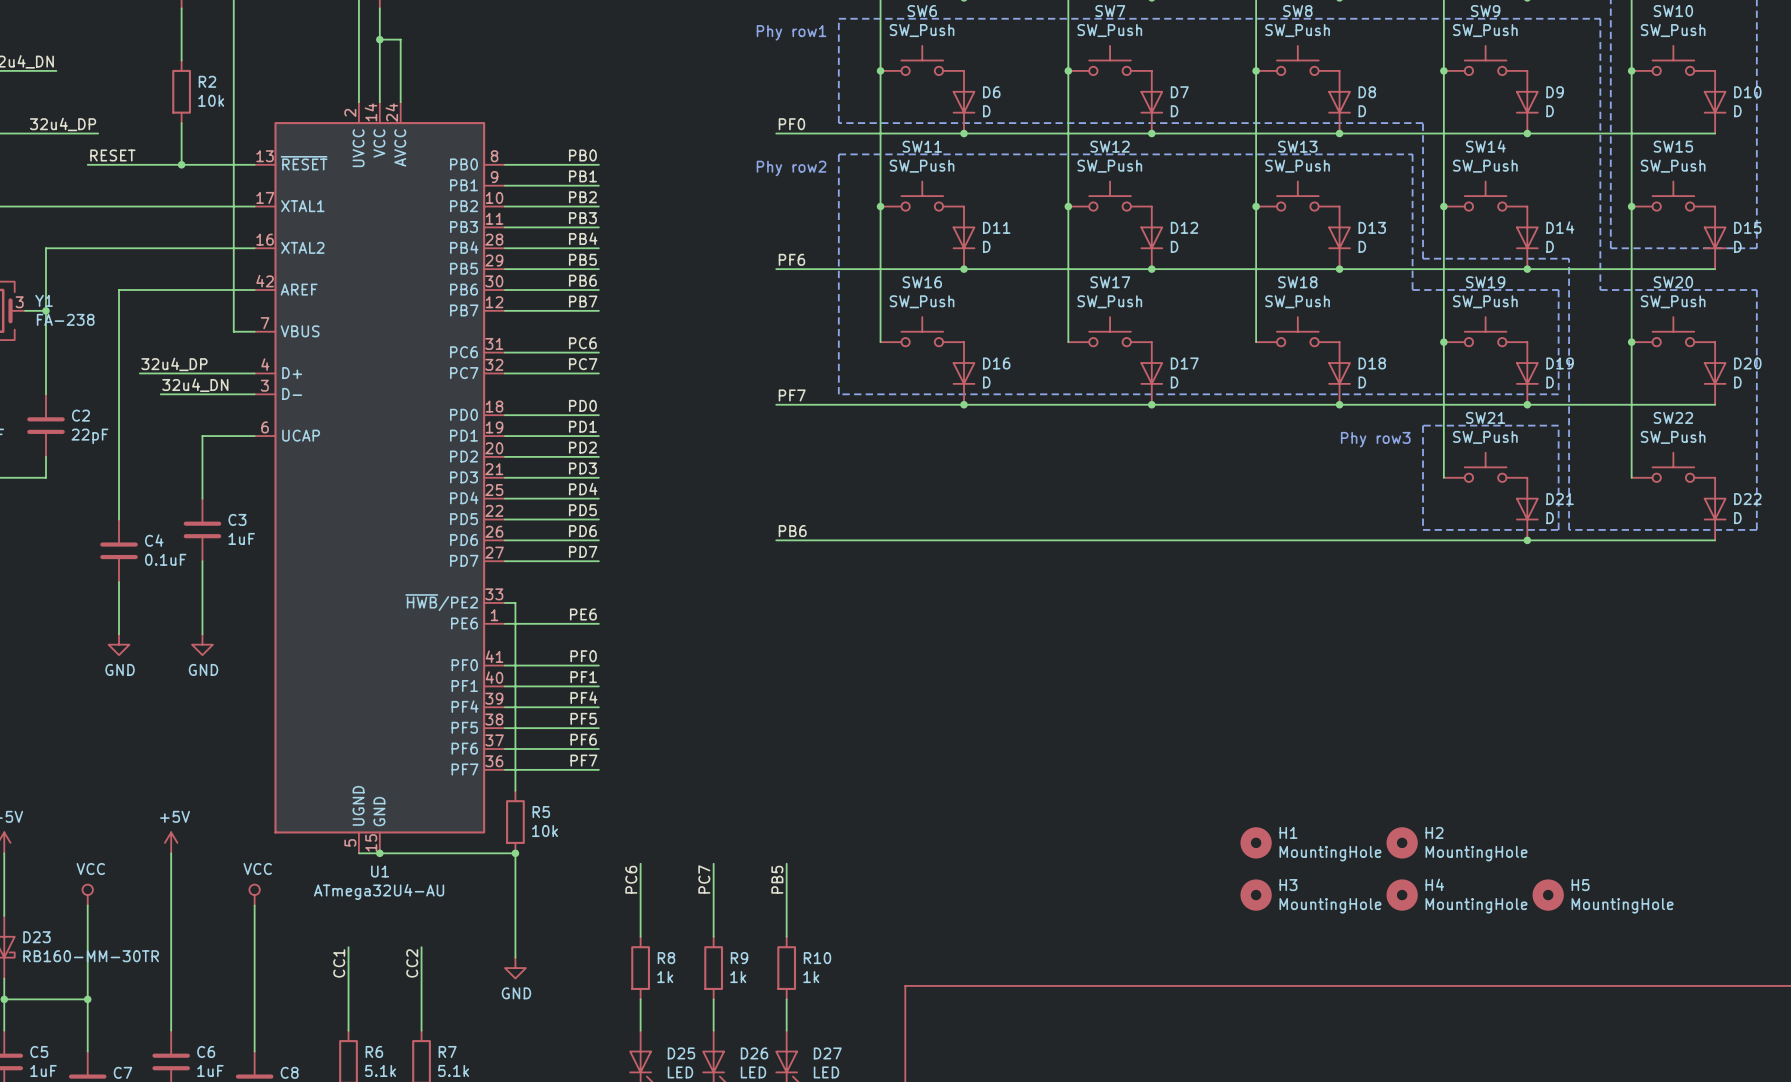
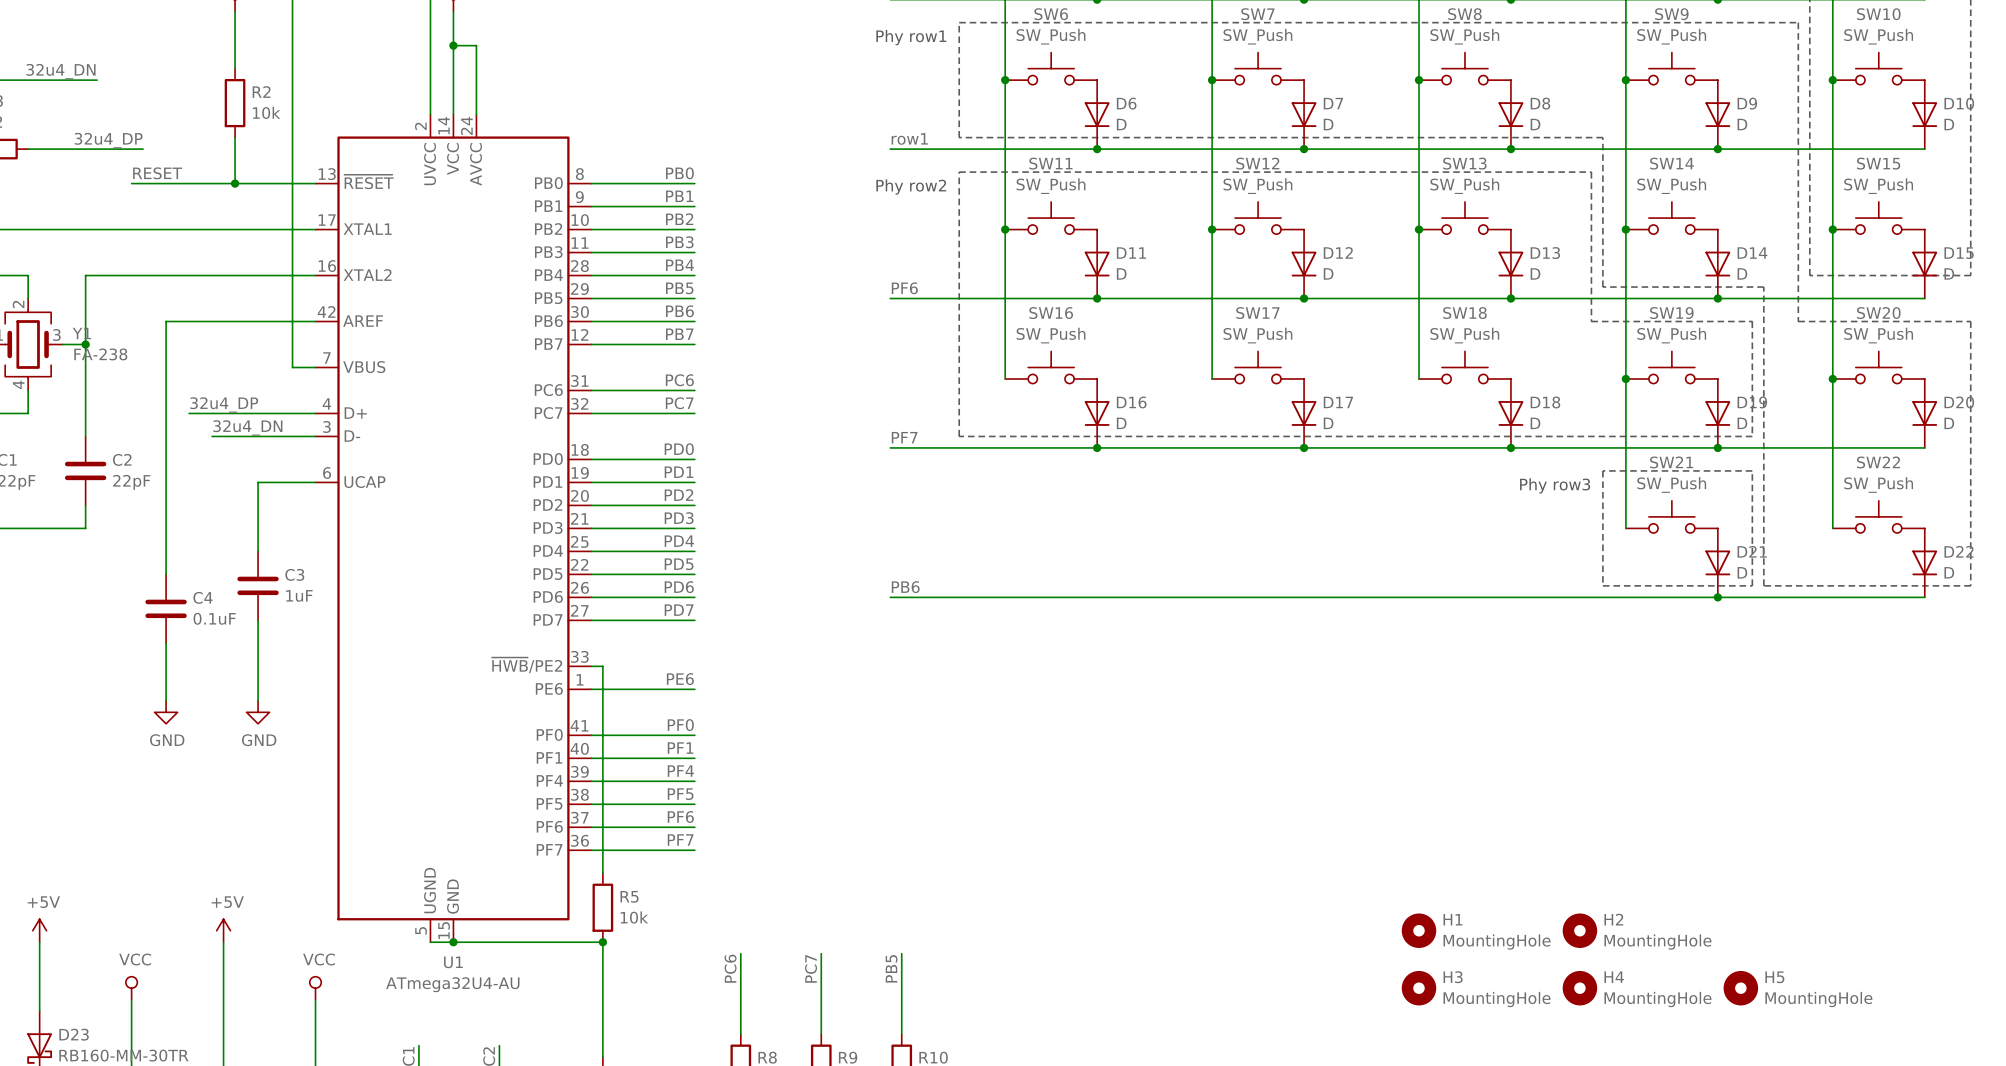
label: PF0 (791, 124) -> row1 (909, 138)

